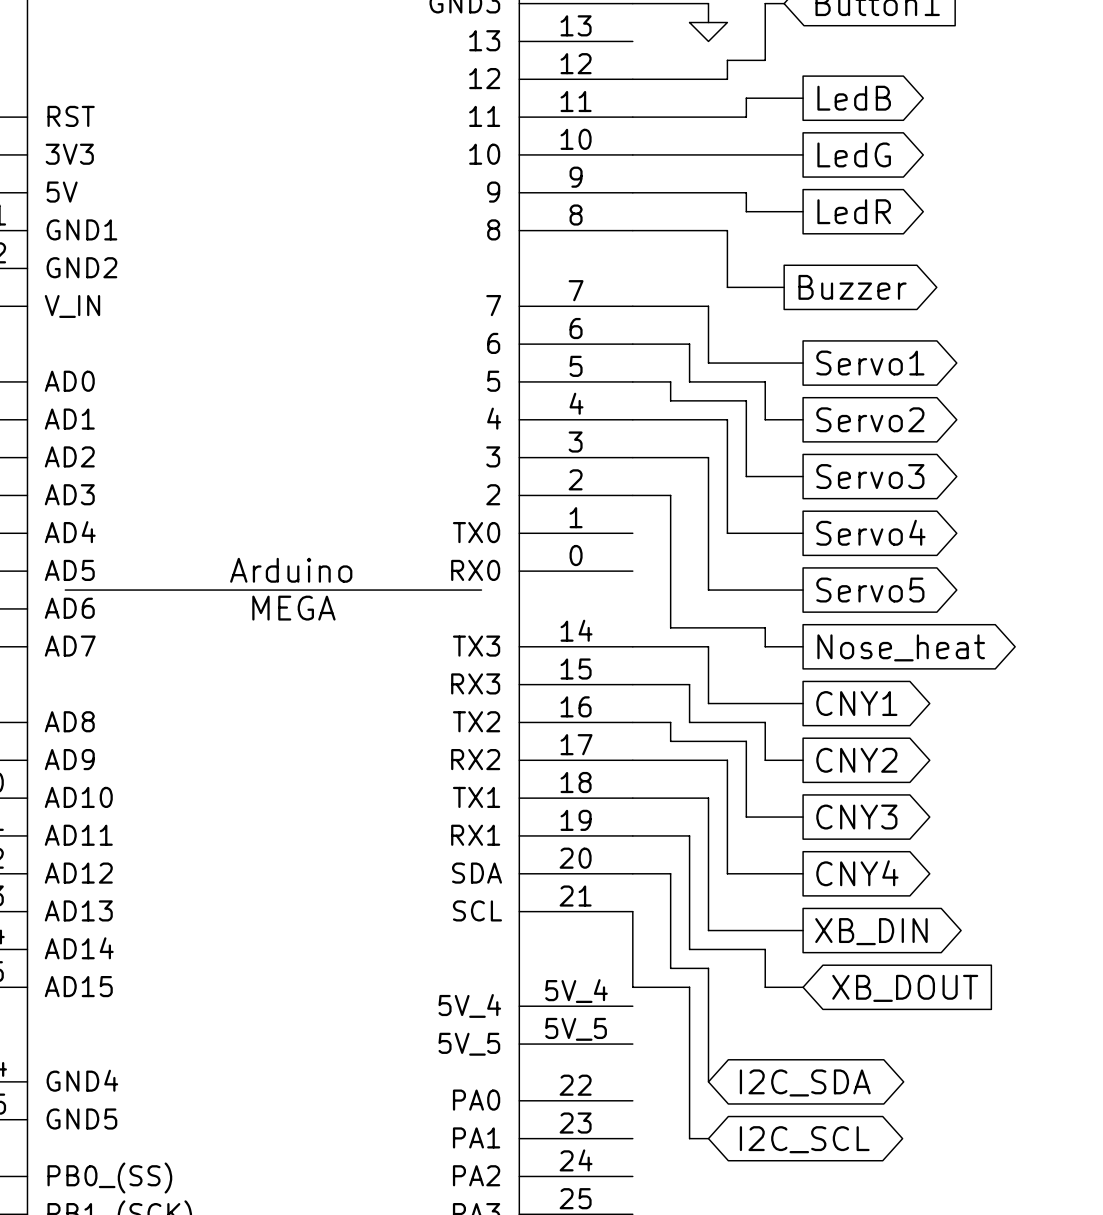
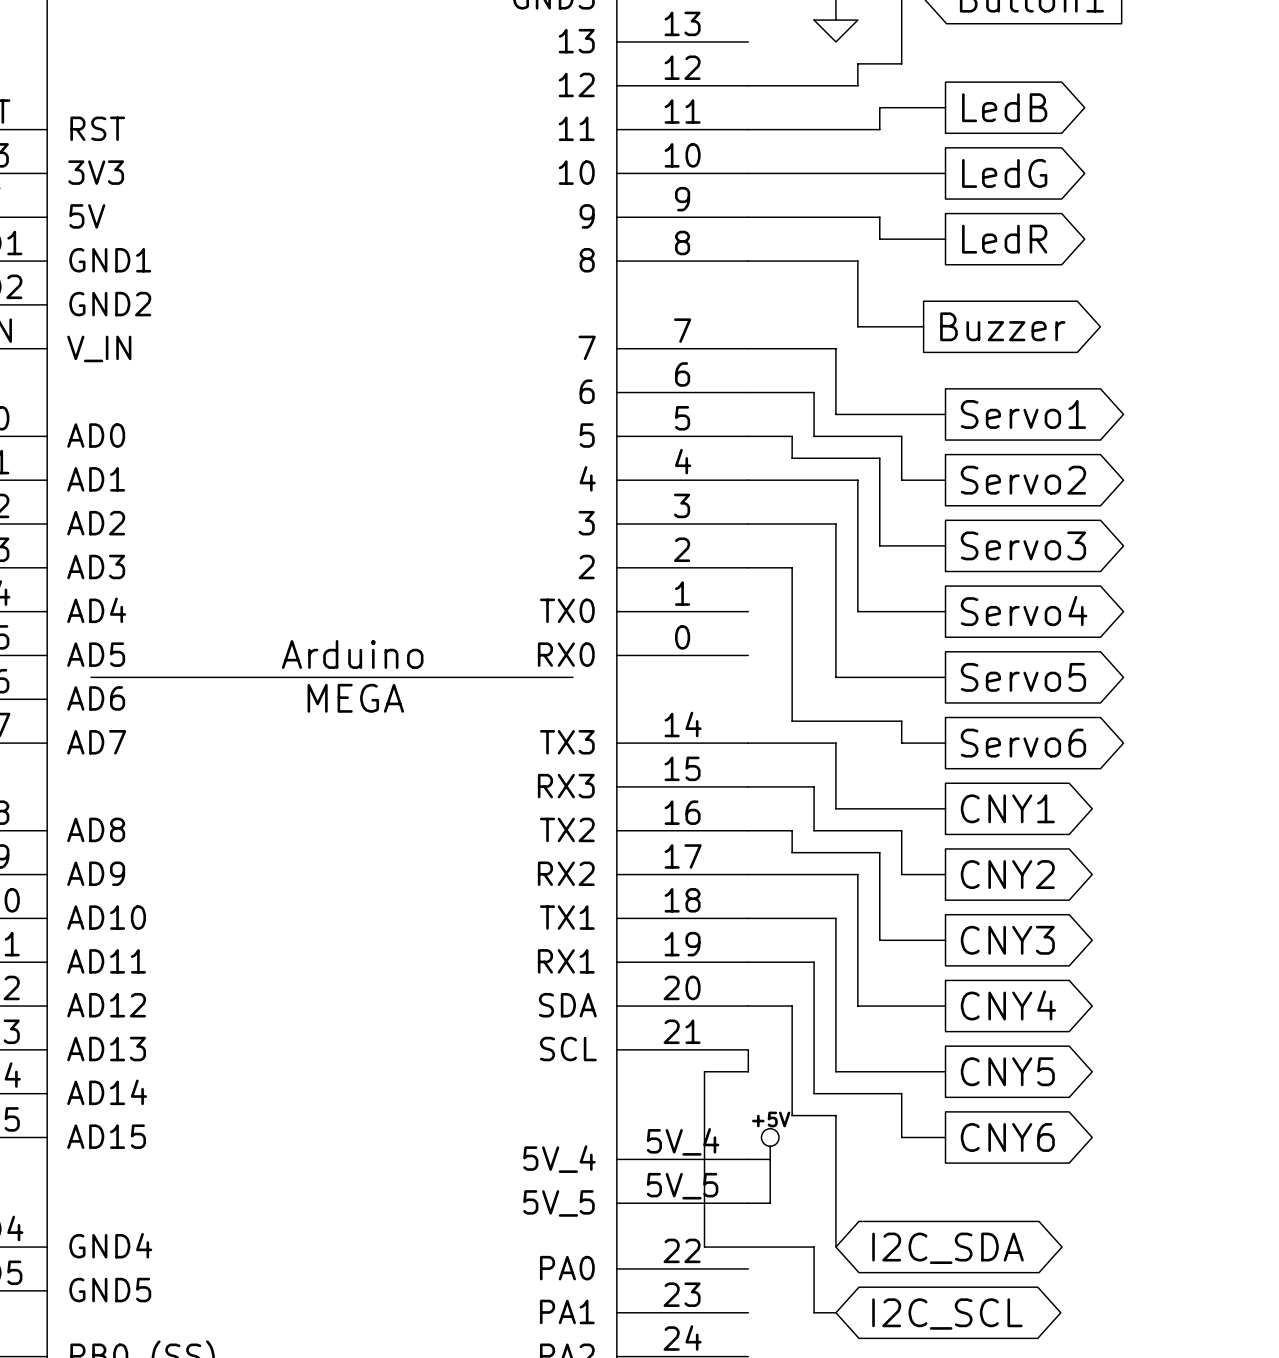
global label: Nose_heat (901, 647) -> Servo6 (1023, 743)
wire: (632, 930) (632, 987) (689, 987) (689, 1081) -> (748, 1071) (704, 1071) (704, 1247) (814, 1247)
global label: XB_DIN (871, 931) -> CNY5 (1007, 1071)
global label shape: input (905, 988) -> output (1007, 1137)
global label: XB_DOUT (905, 988) -> CNY6 (1007, 1137)
power symbol: none -> +5V (770, 1144)
wire: none -> (748, 1159) (770, 1159) (770, 1203) (748, 1203)

